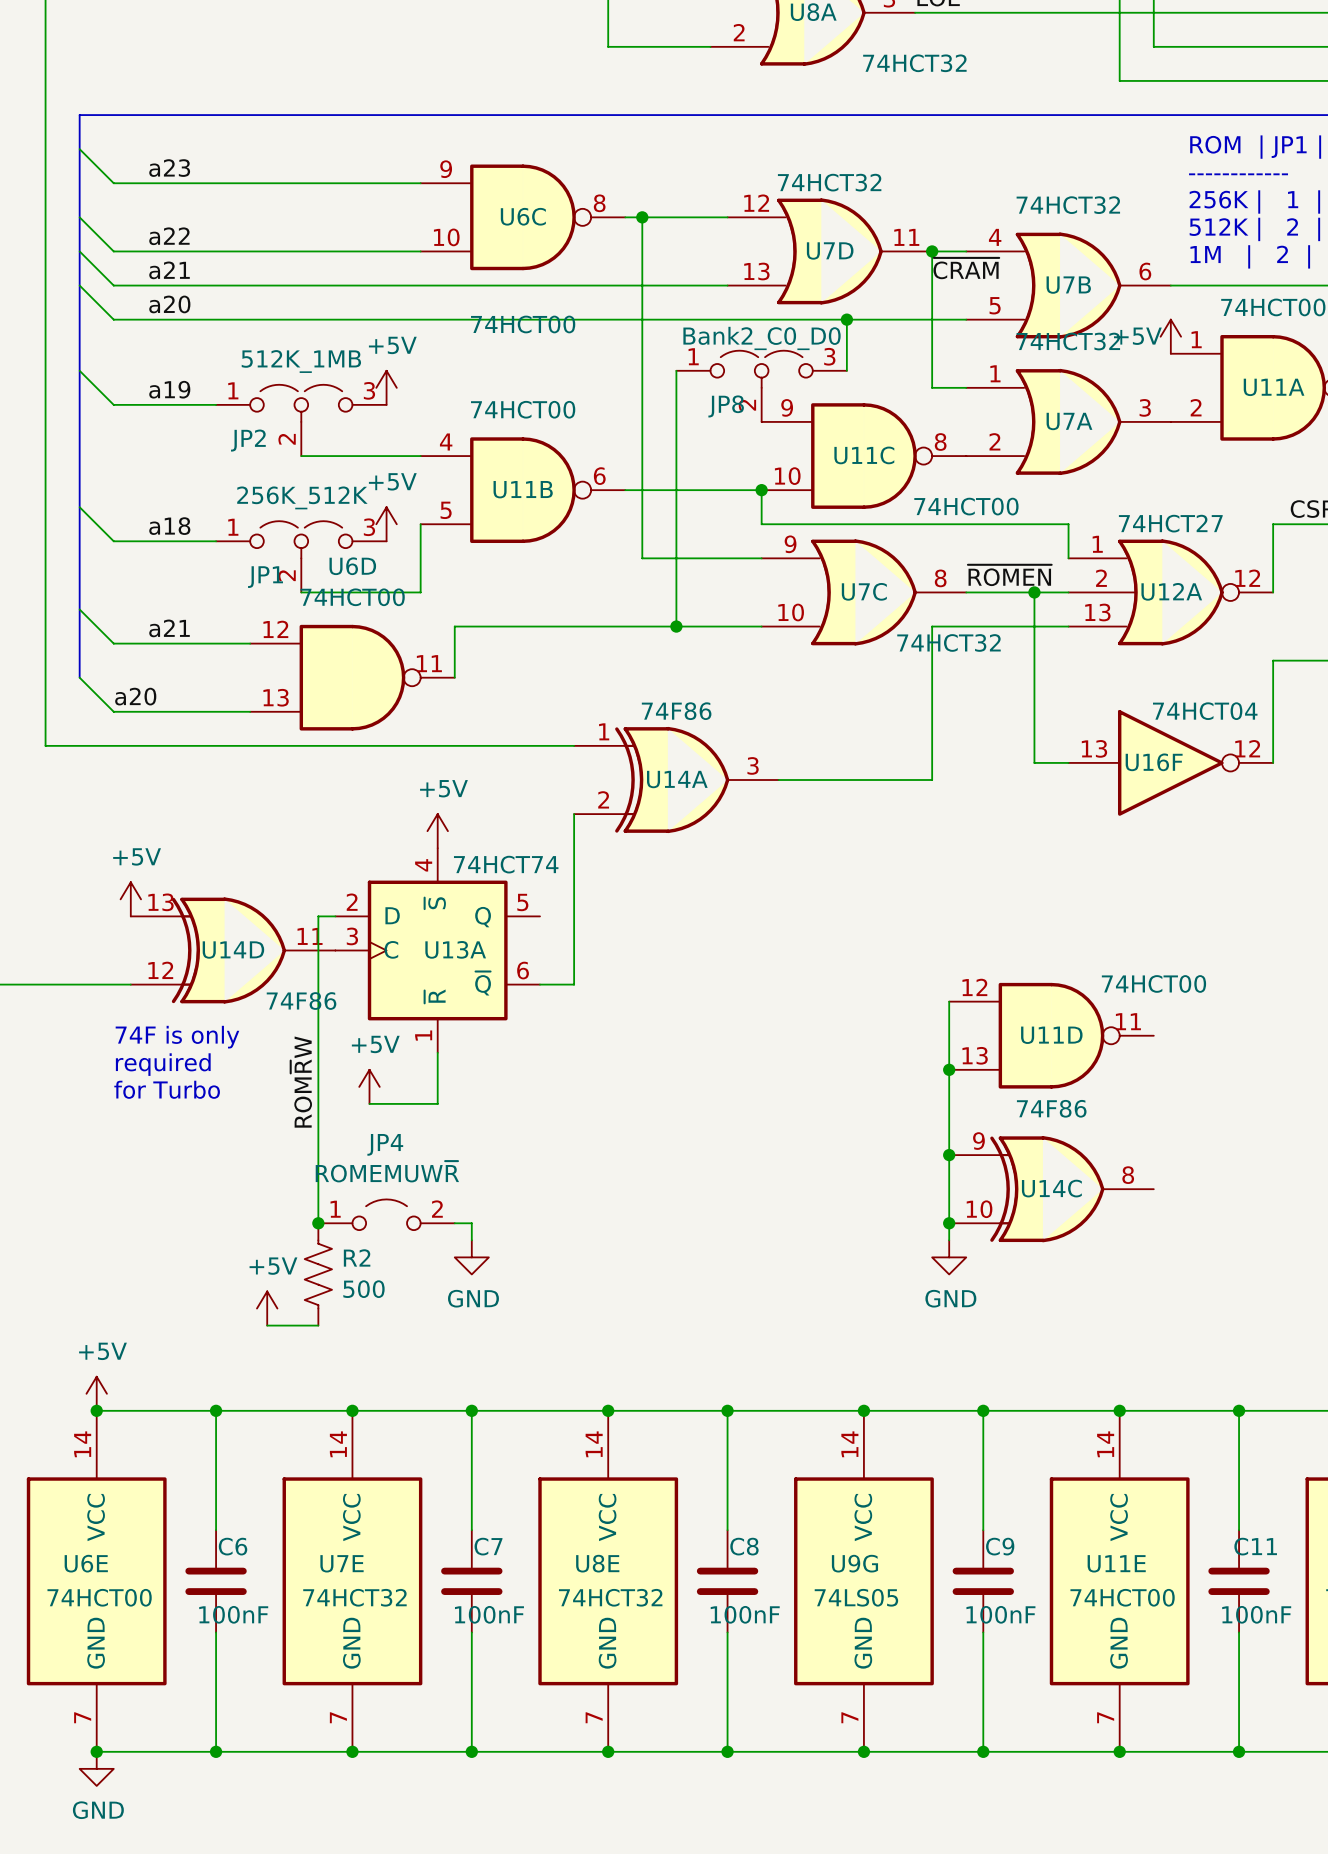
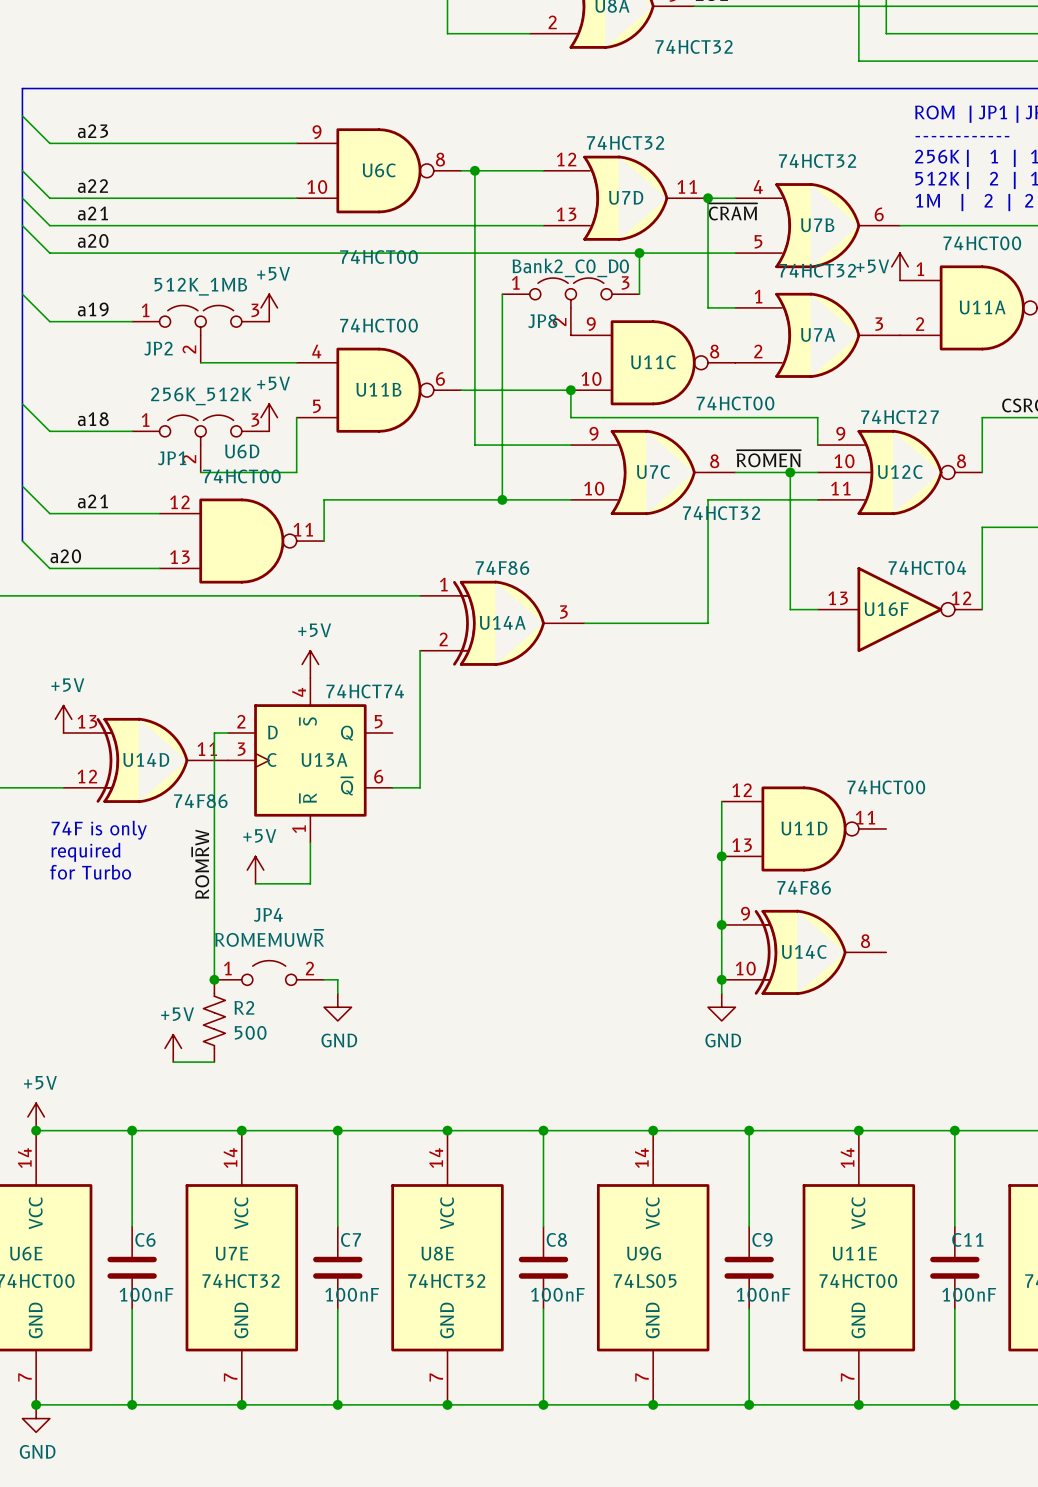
U12A pin number: 1 (1097, 544) -> 9 (840, 433)
U12A pin number: 2 (1101, 578) -> 10 (844, 461)
U12A pin number: 12 (1247, 578) -> 8 (961, 461)
U12A name: U12A (1171, 591) -> U12C (900, 472)
U12A pin number: 13 (1097, 612) -> 11 (840, 488)

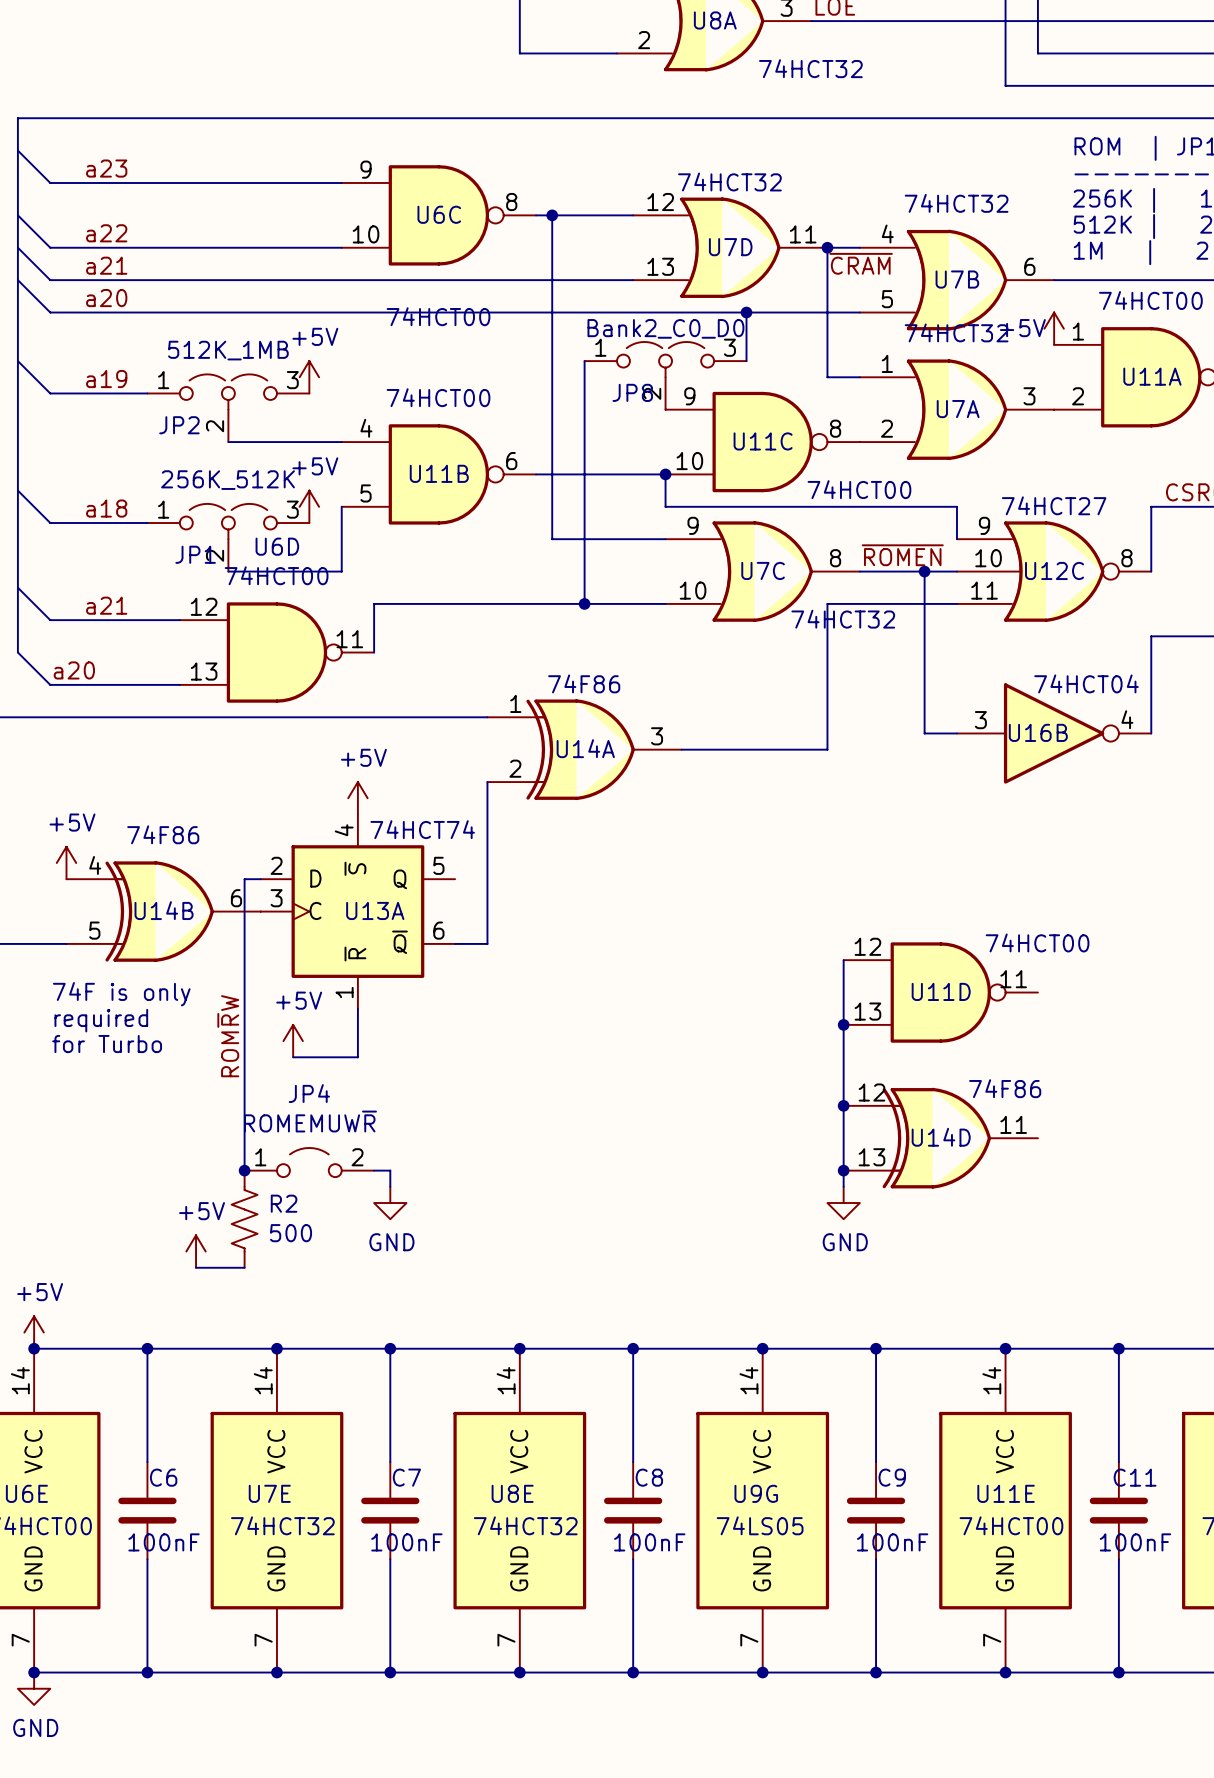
U16F pin number: 13 (838, 598) -> 3 (980, 720)
U16F pin number: 12 (961, 598) -> 4 (1127, 719)
U16F name: U16F (886, 609) -> U16B (1038, 732)
U14D flip: as is (142, 760) -> up-down (936, 1138)
U14D position: (145, 760) -> (940, 1138)
U14B: none -> 74F86 (163, 911)
U14C: 74F86 (804, 952) -> none

